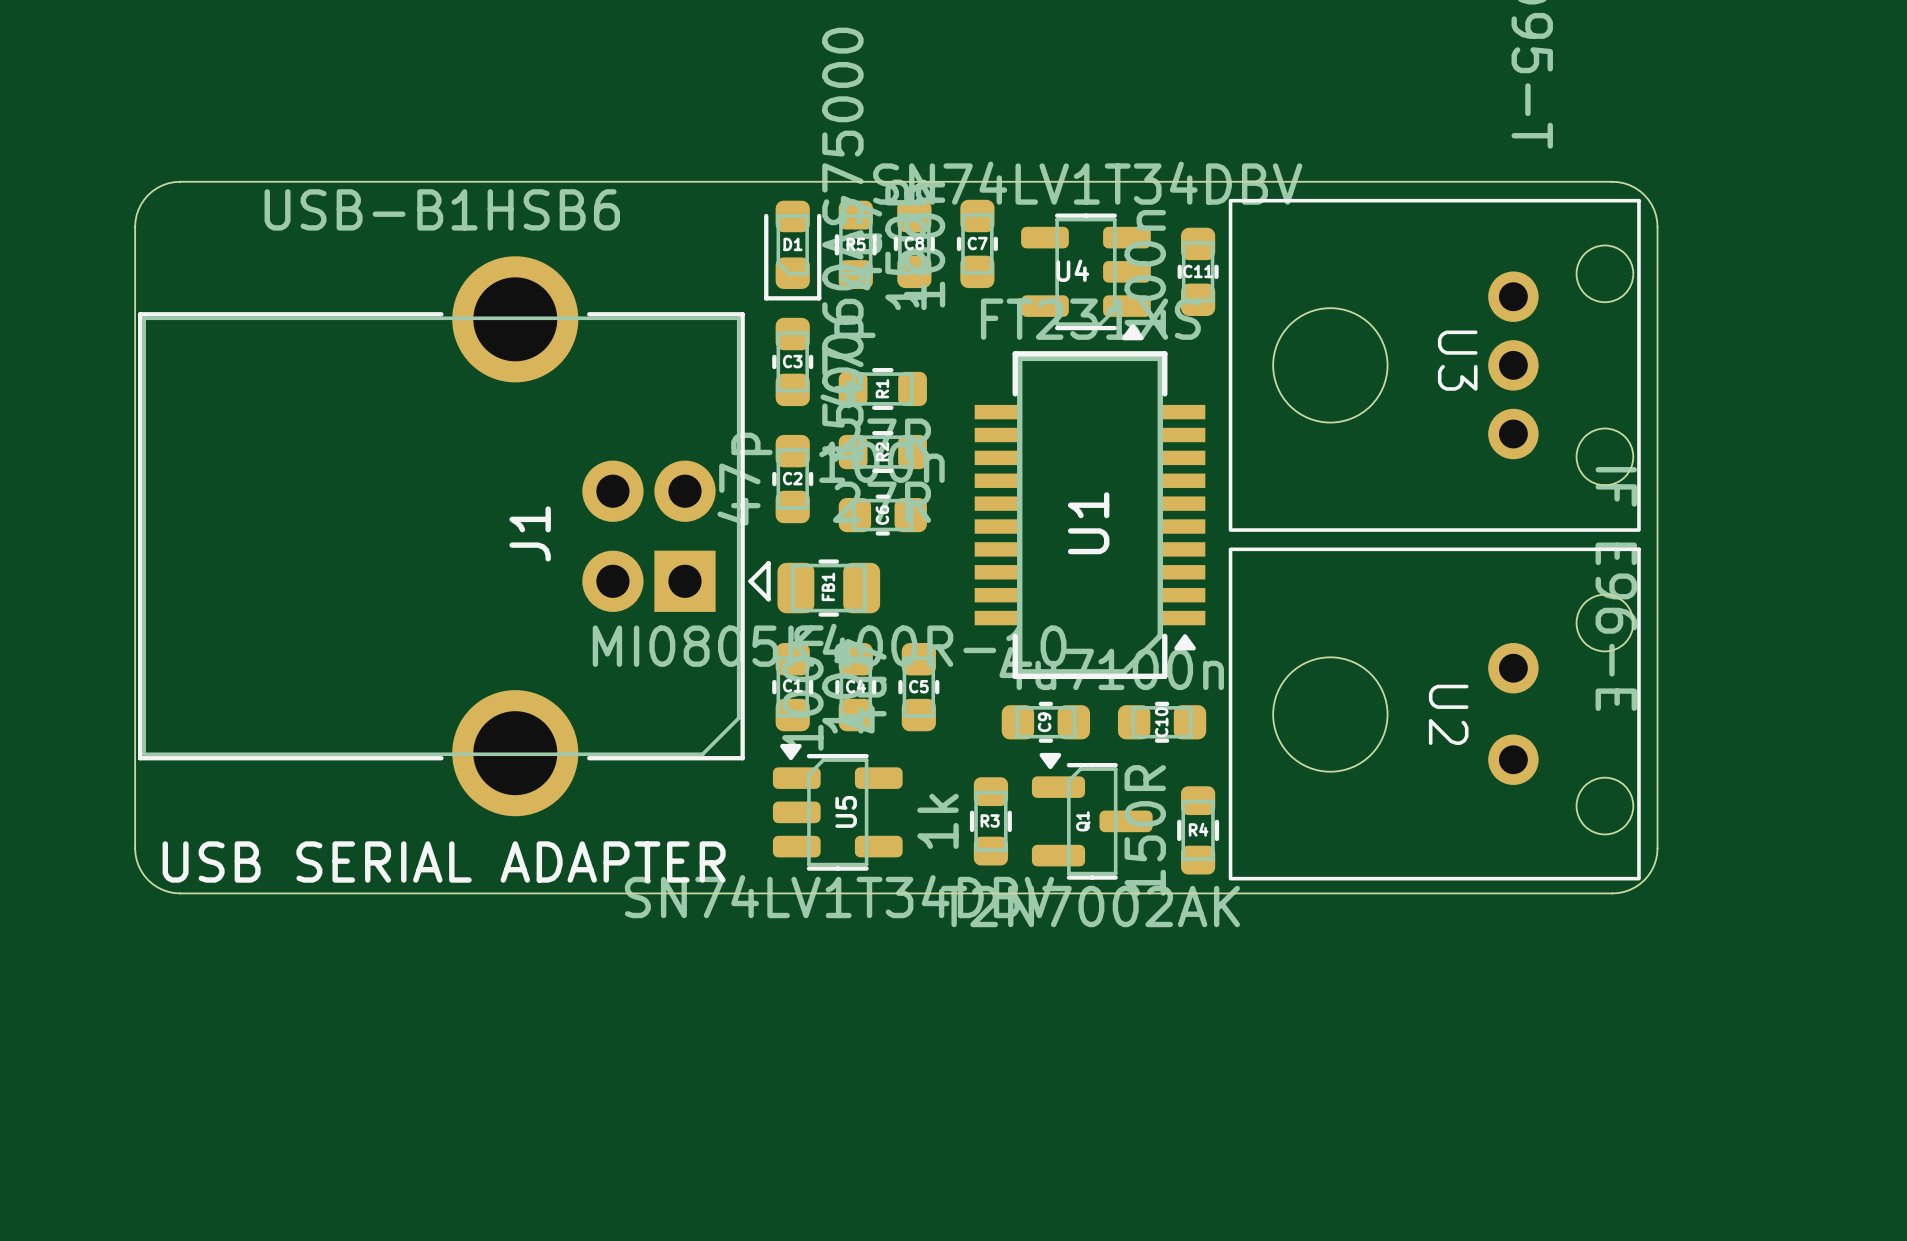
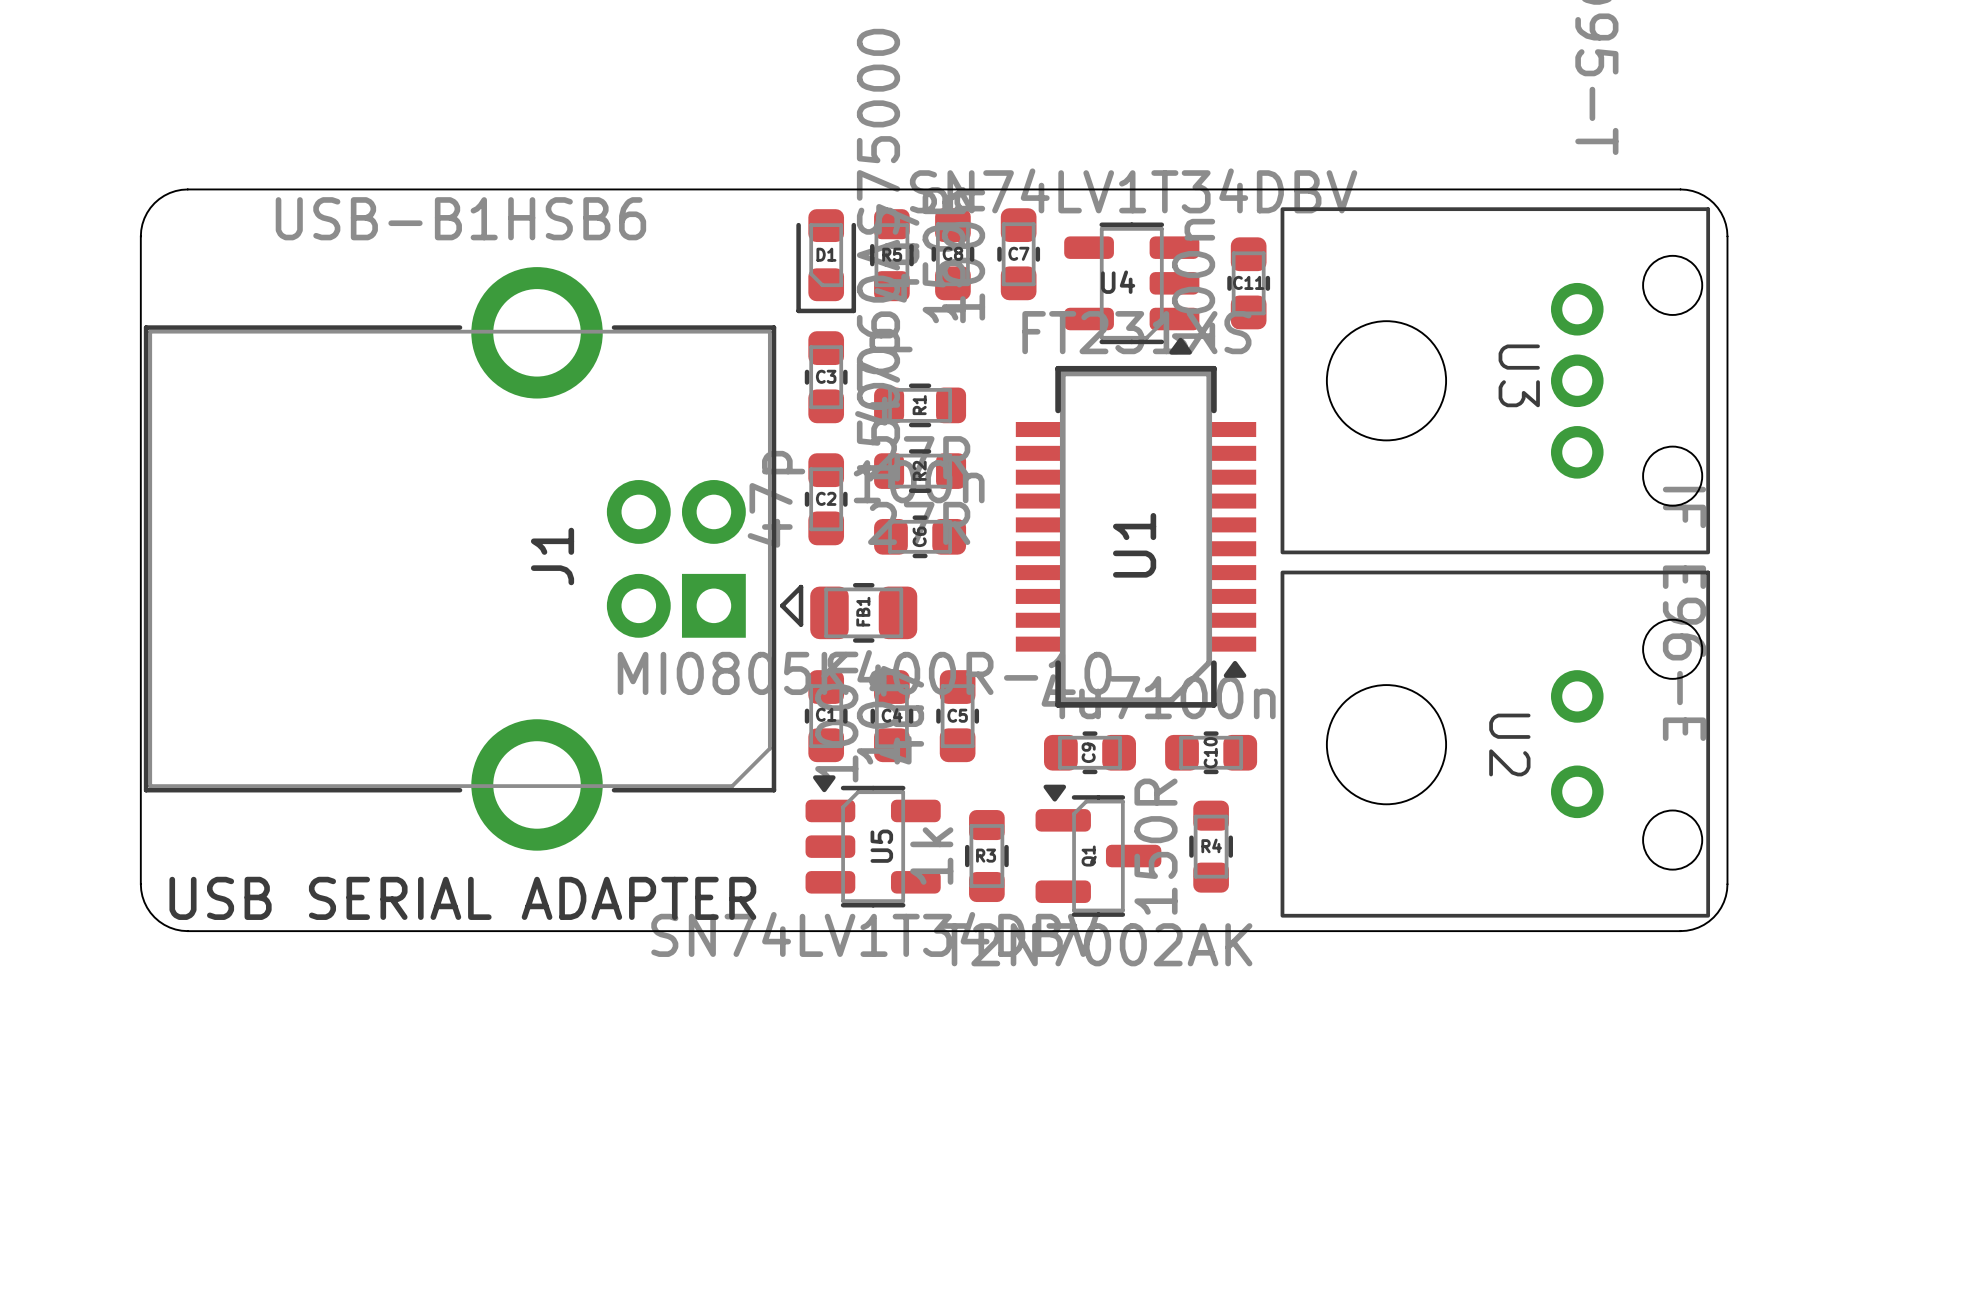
Q1 position: (1092, 816) -> (1098, 850)
R3 position: (990, 821) -> (986, 856)
R4 position: (1198, 830) -> (1211, 846)

